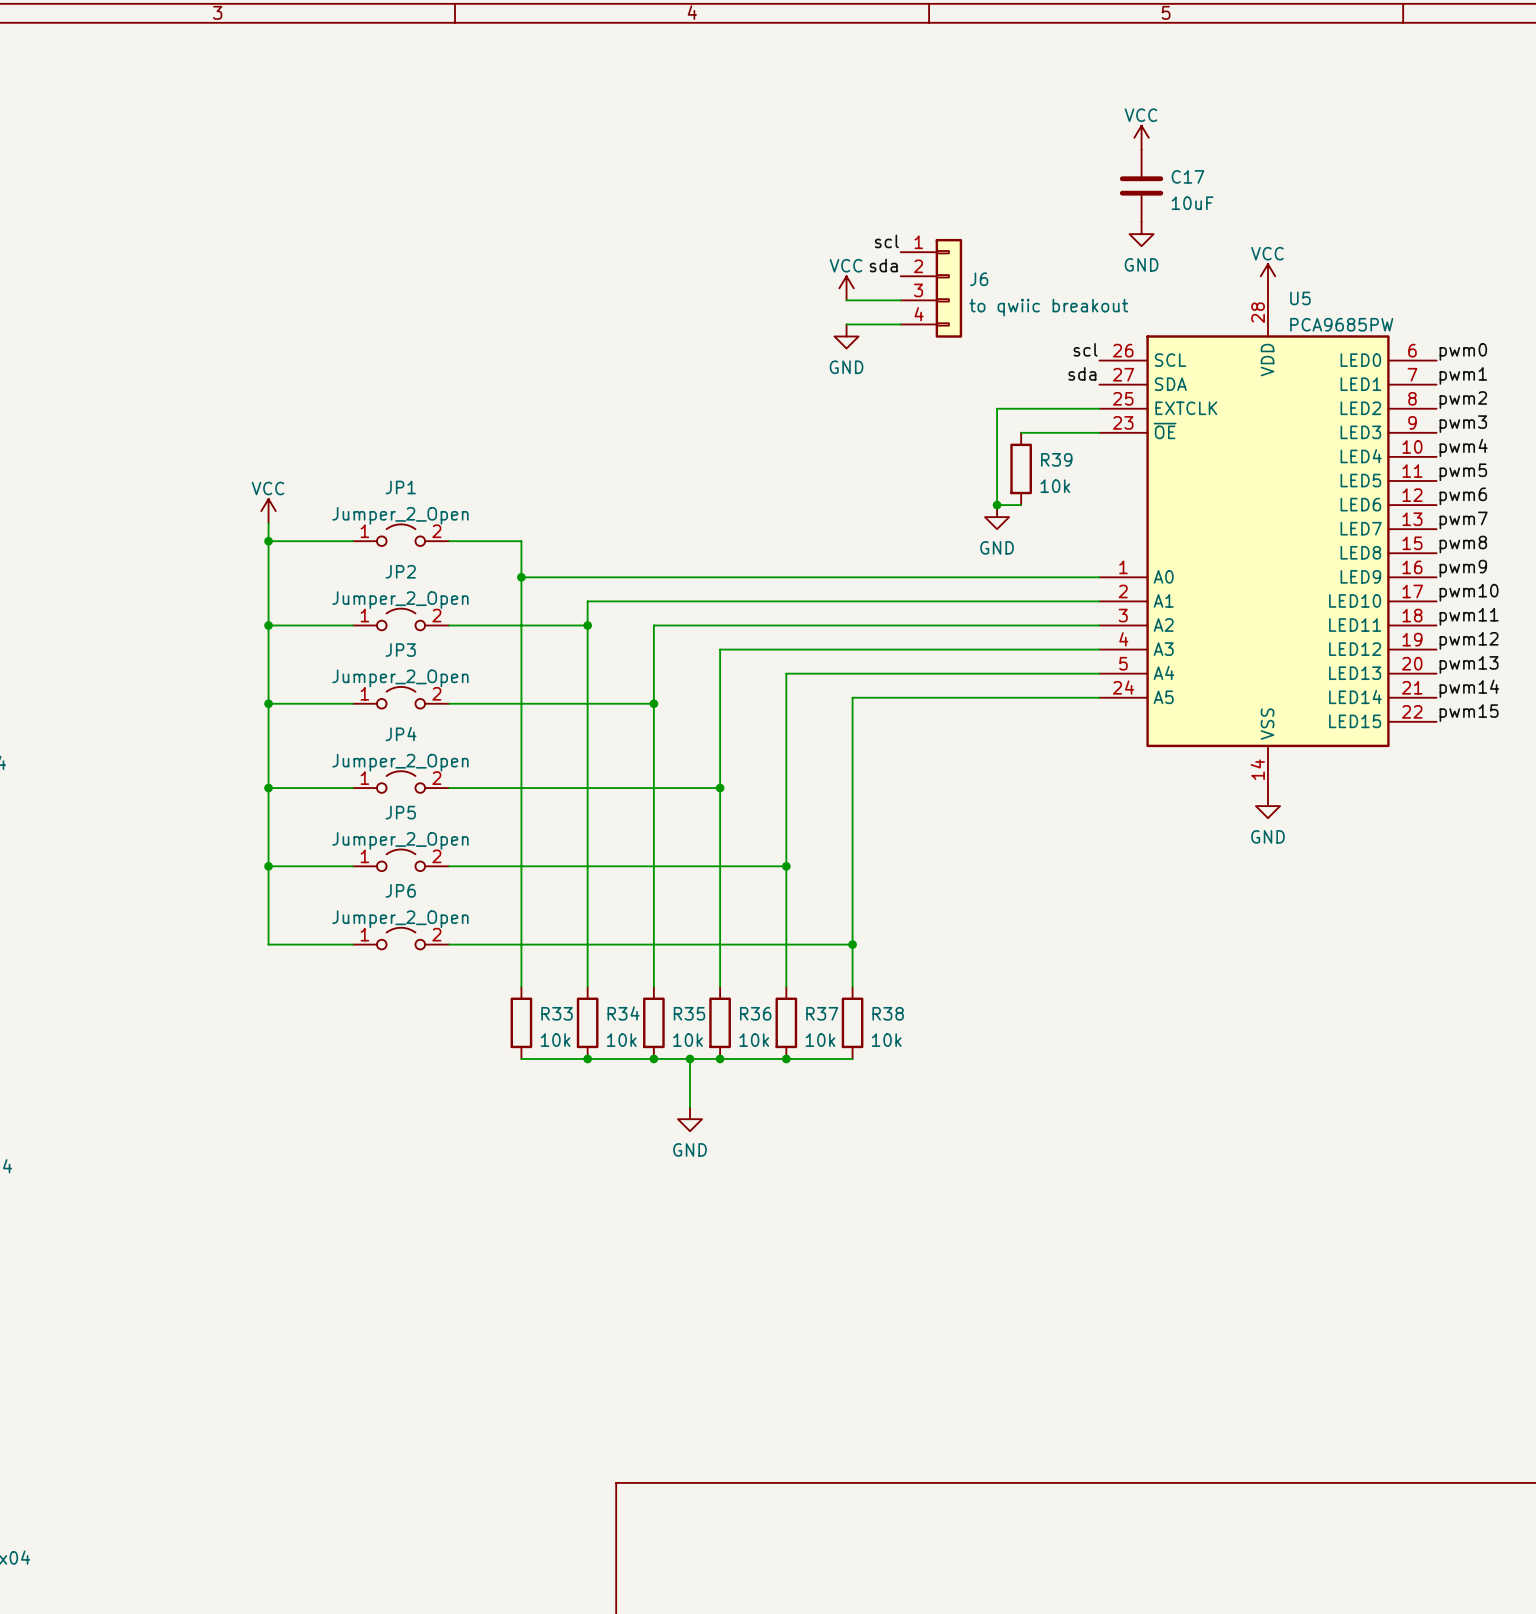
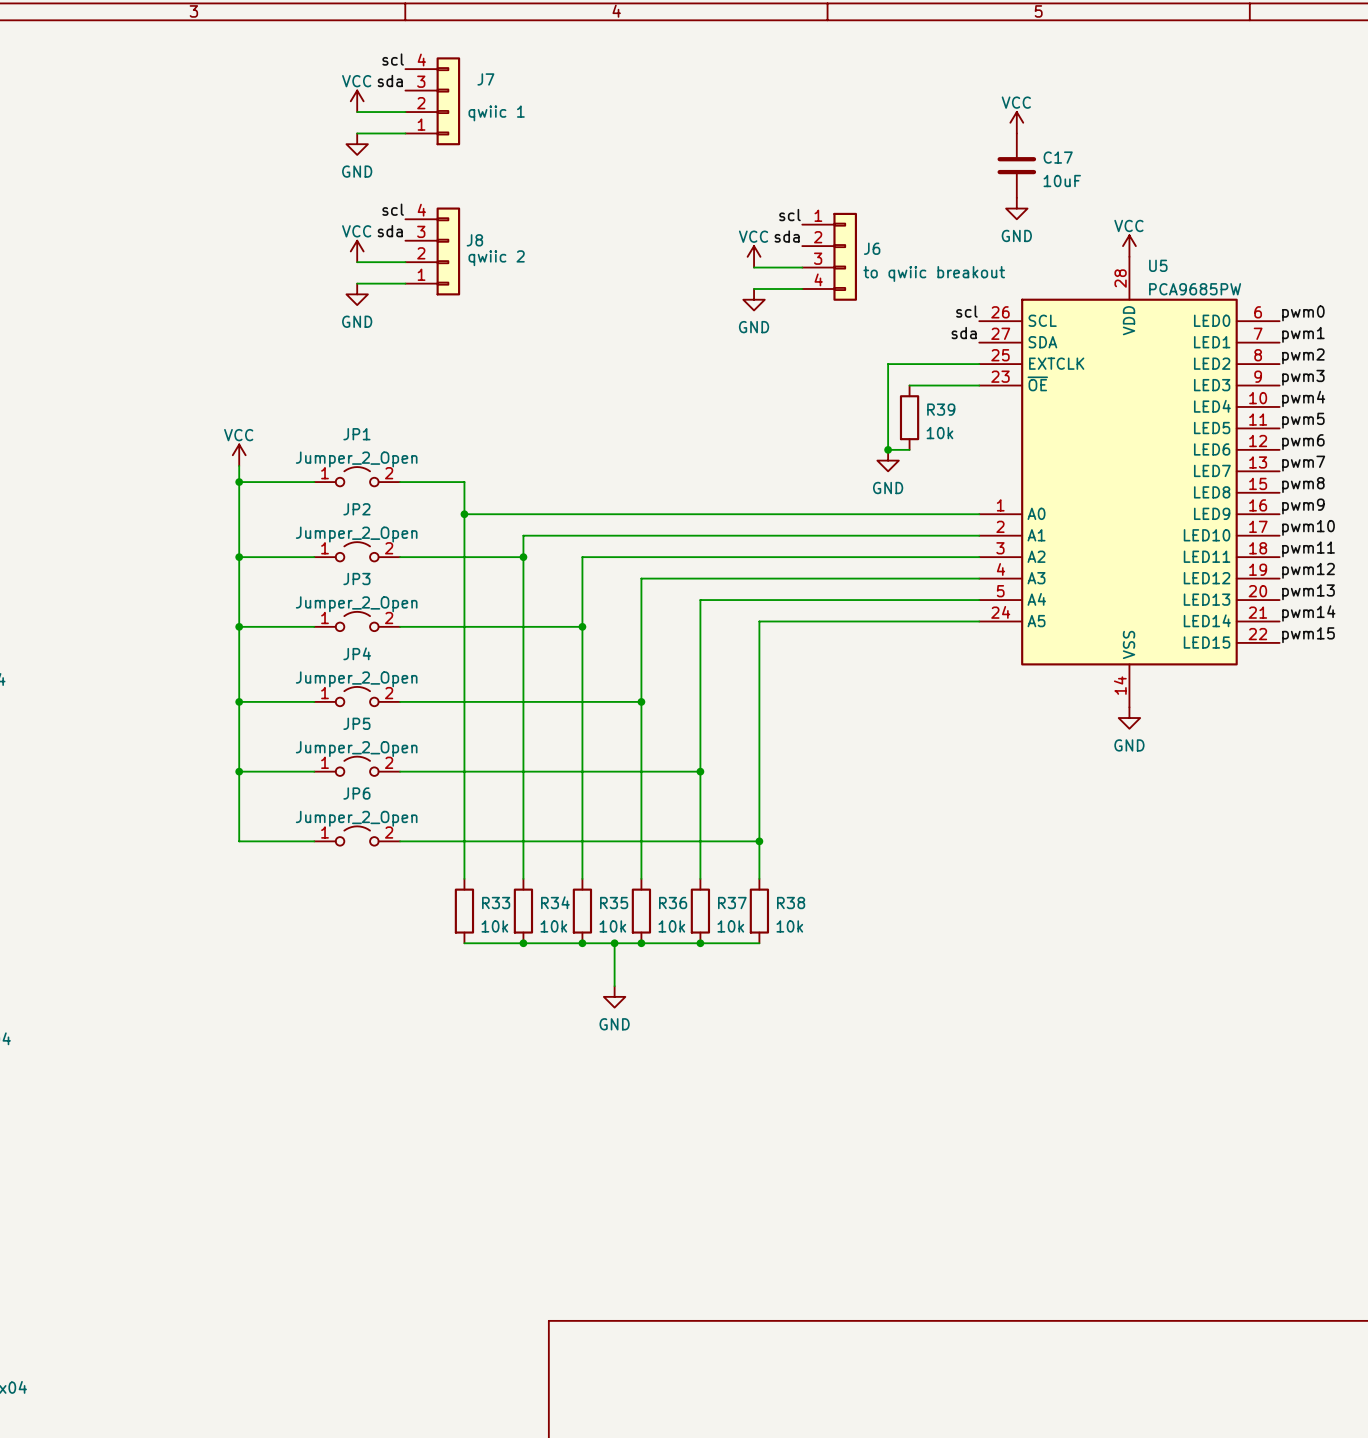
label: none -> scl (393, 59)
label: none -> sda (390, 81)
power symbol: none -> VCC (357, 101)
J7: none -> qwiic 1 (432, 101)
wire: none -> (357, 112) (405, 112)
wire: none -> (357, 133) (405, 133)
power symbol: none -> GND (357, 144)
label: none -> scl (393, 209)
label: none -> sda (390, 231)
power symbol: none -> VCC (357, 251)
J8: none -> qwiic 2 (432, 251)
wire: none -> (357, 262) (405, 262)
wire: none -> (357, 283) (405, 283)
power symbol: none -> GND (357, 294)

